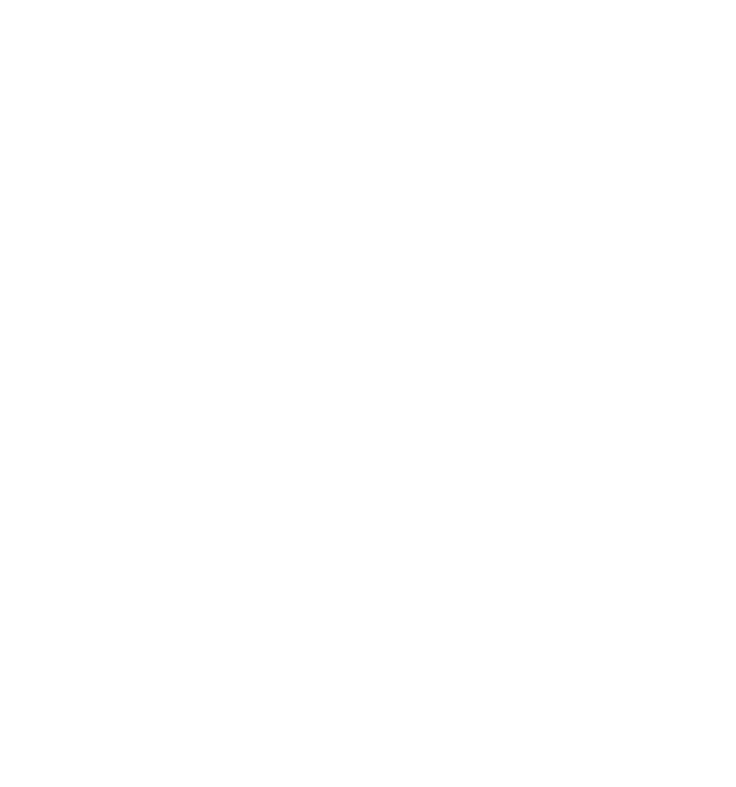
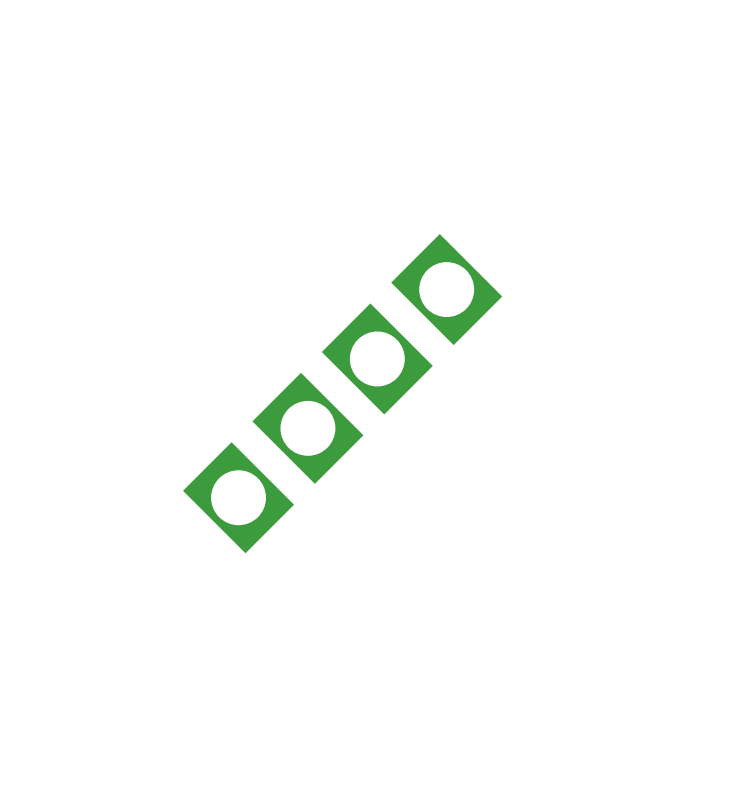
part: none -> (342, 393)

